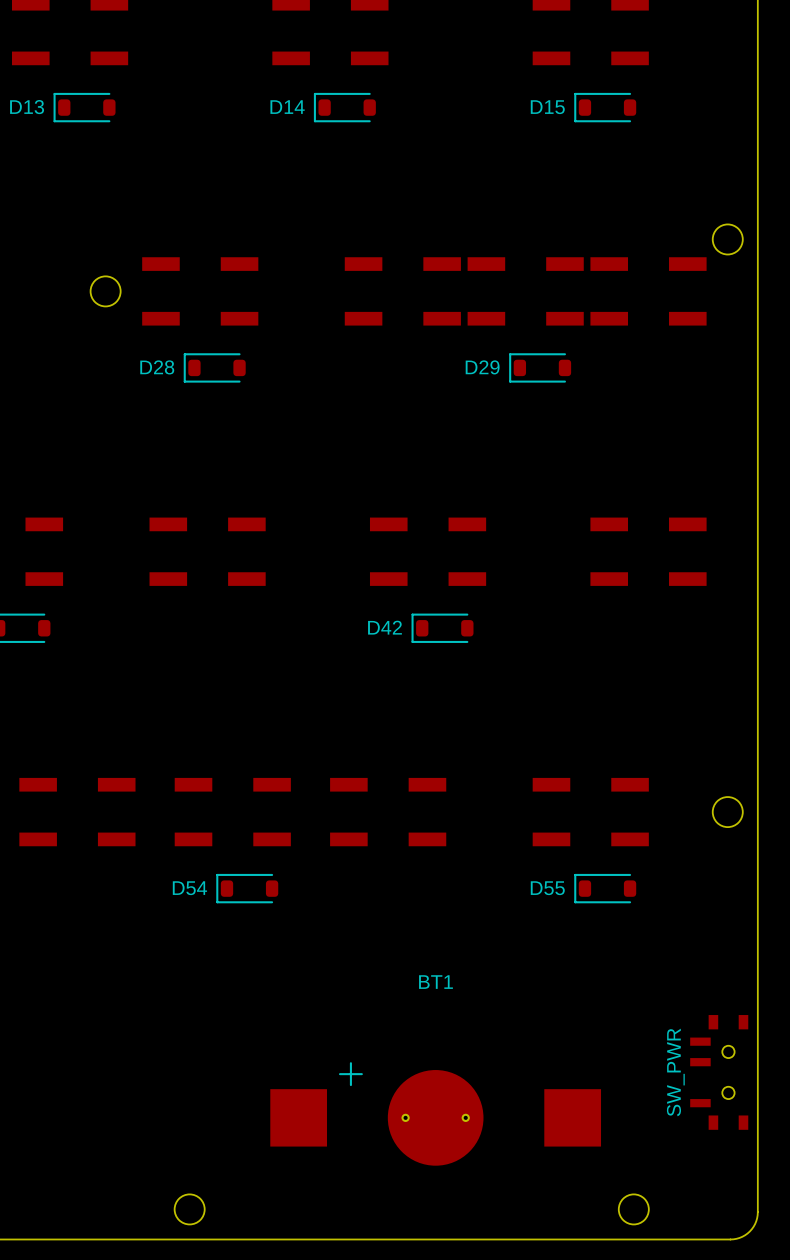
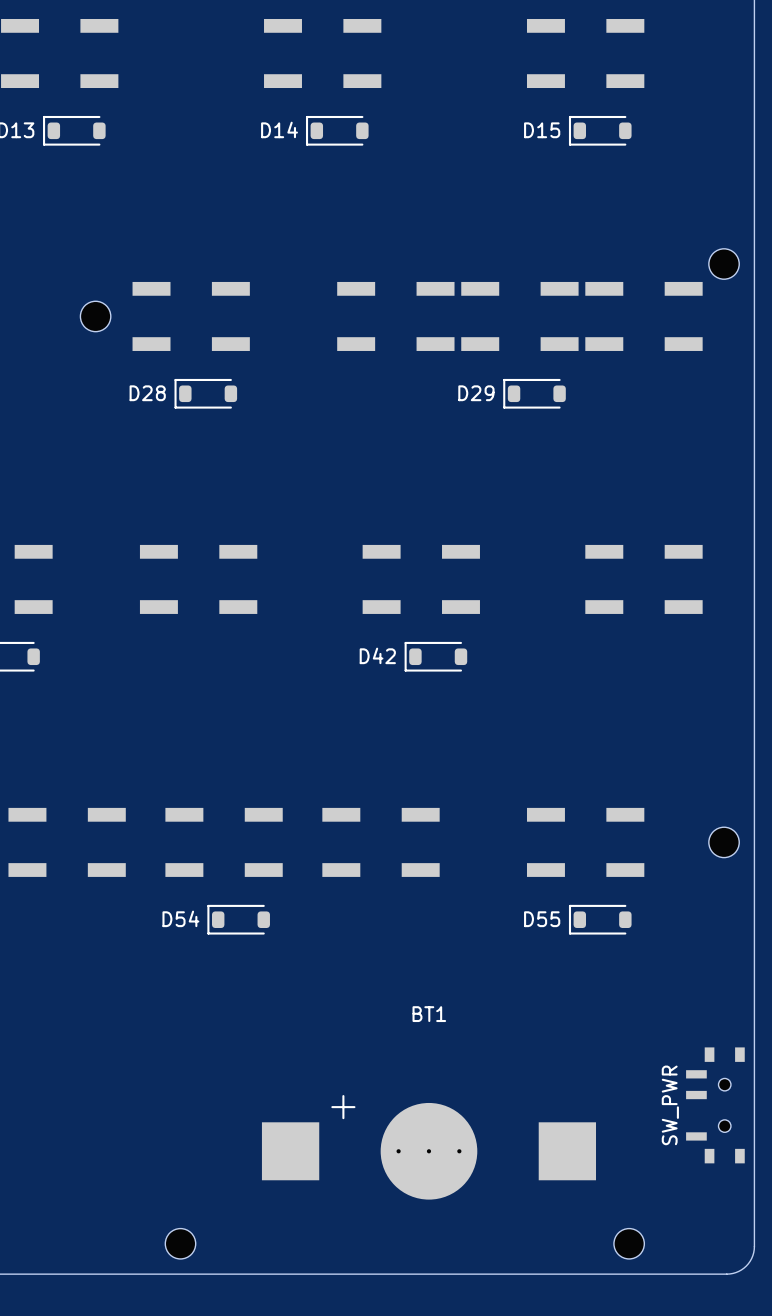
BT1 footprint: [270, 1062, 602, 1166] -> [261, 1095, 597, 1200]

